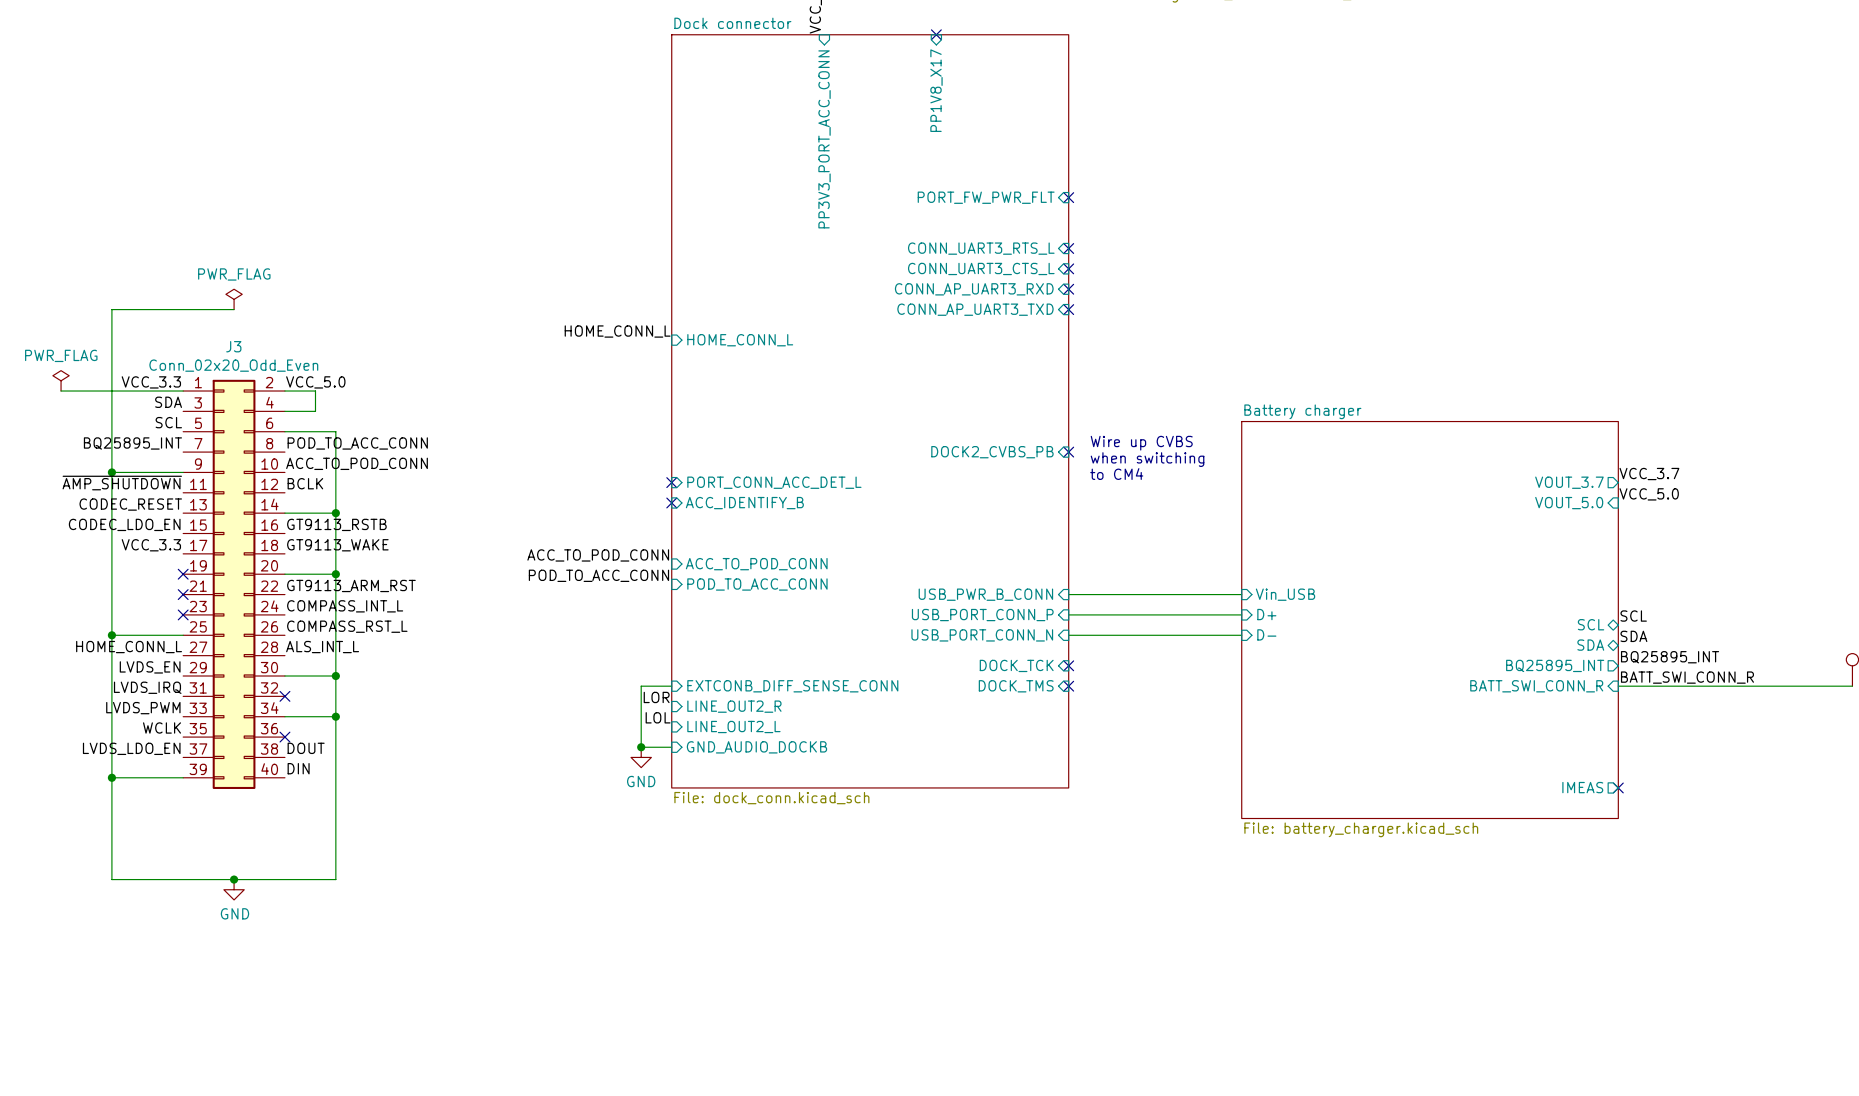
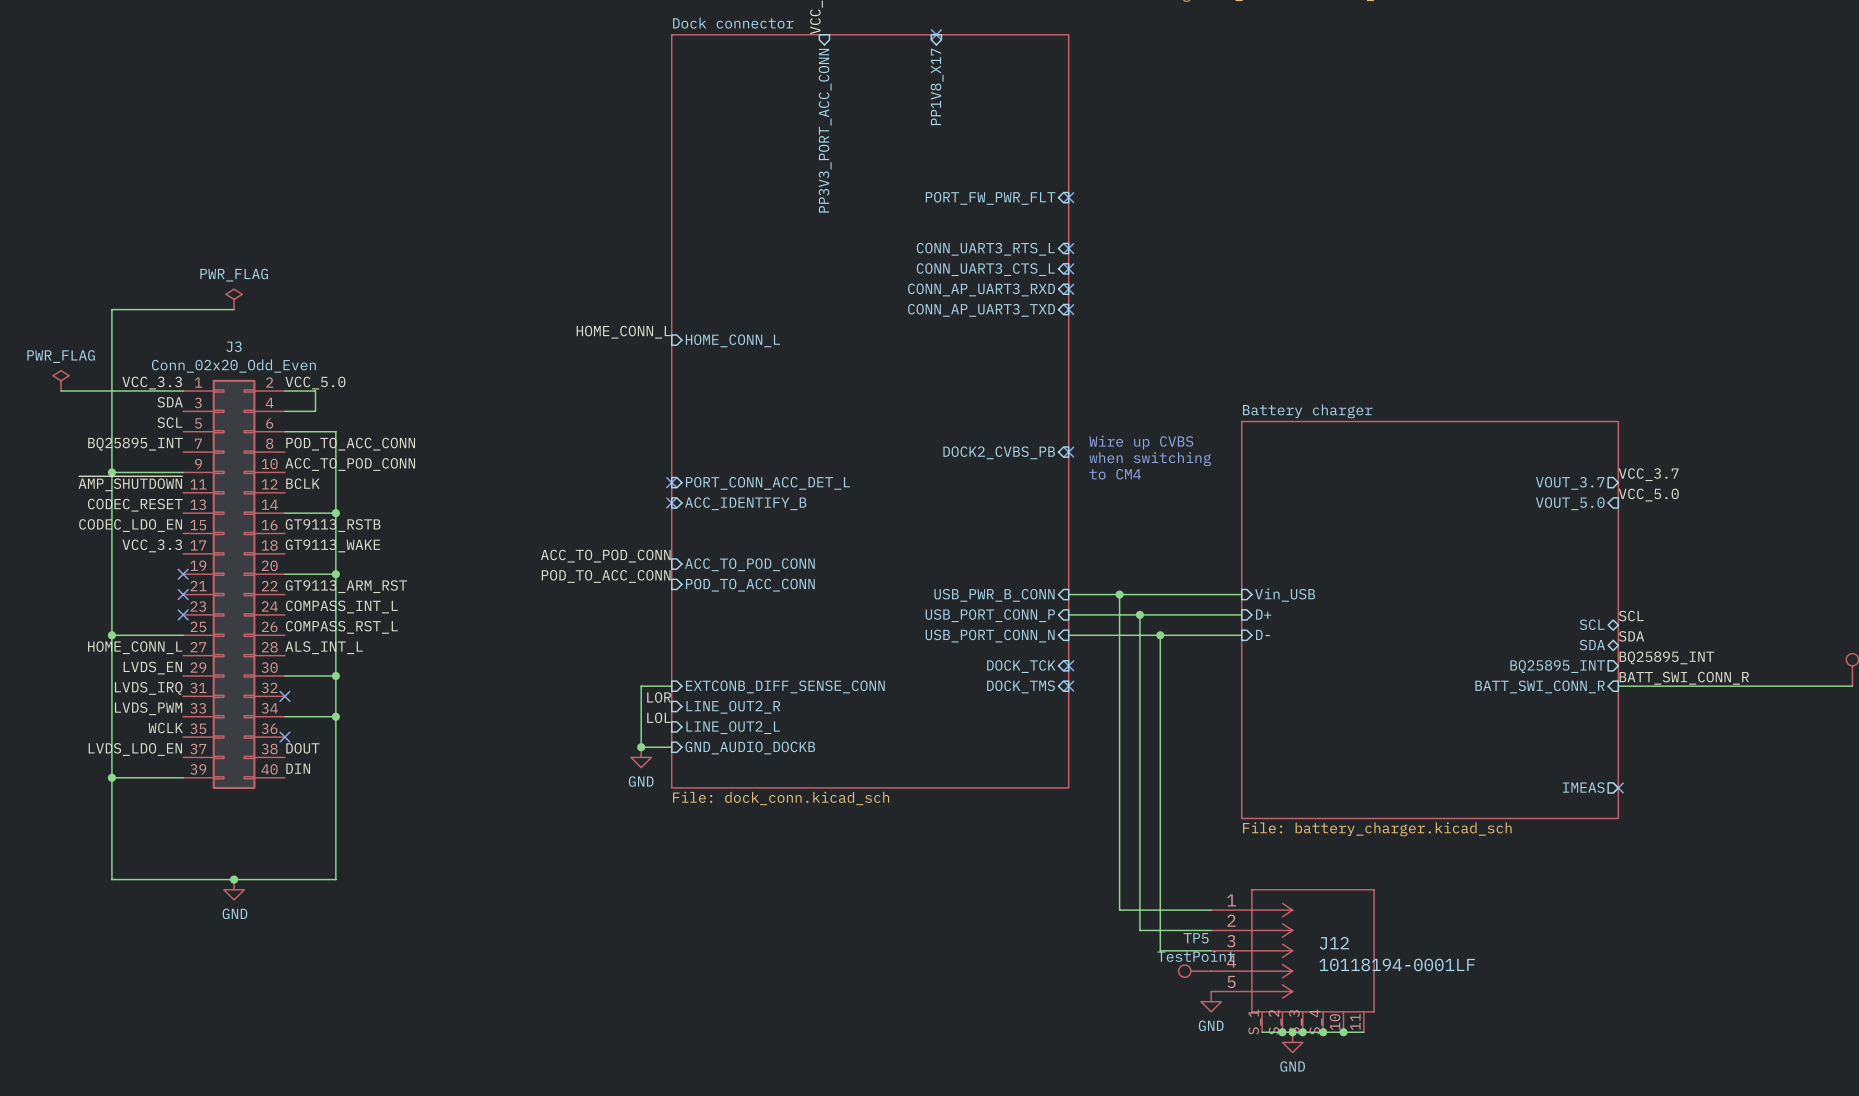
wire: none -> (1119, 594) (1119, 910) (1211, 910)
junction: none -> (1119, 594)
wire: none -> (1139, 614) (1139, 930) (1211, 930)
junction: none -> (1139, 614)
wire: none -> (1160, 635) (1160, 950) (1211, 950)
junction: none -> (1160, 635)
J12: none -> 10118194-0001LF (1292, 960)
TP5: none -> TestPoint (1194, 971)
power symbol: none -> GND (1211, 1001)
wire: none -> (1262, 1032) (1363, 1032)
junction: none -> (1282, 1032)
junction: none -> (1292, 1032)
junction: none -> (1302, 1032)
junction: none -> (1323, 1032)
junction: none -> (1343, 1032)
power symbol: none -> GND (1292, 1042)

